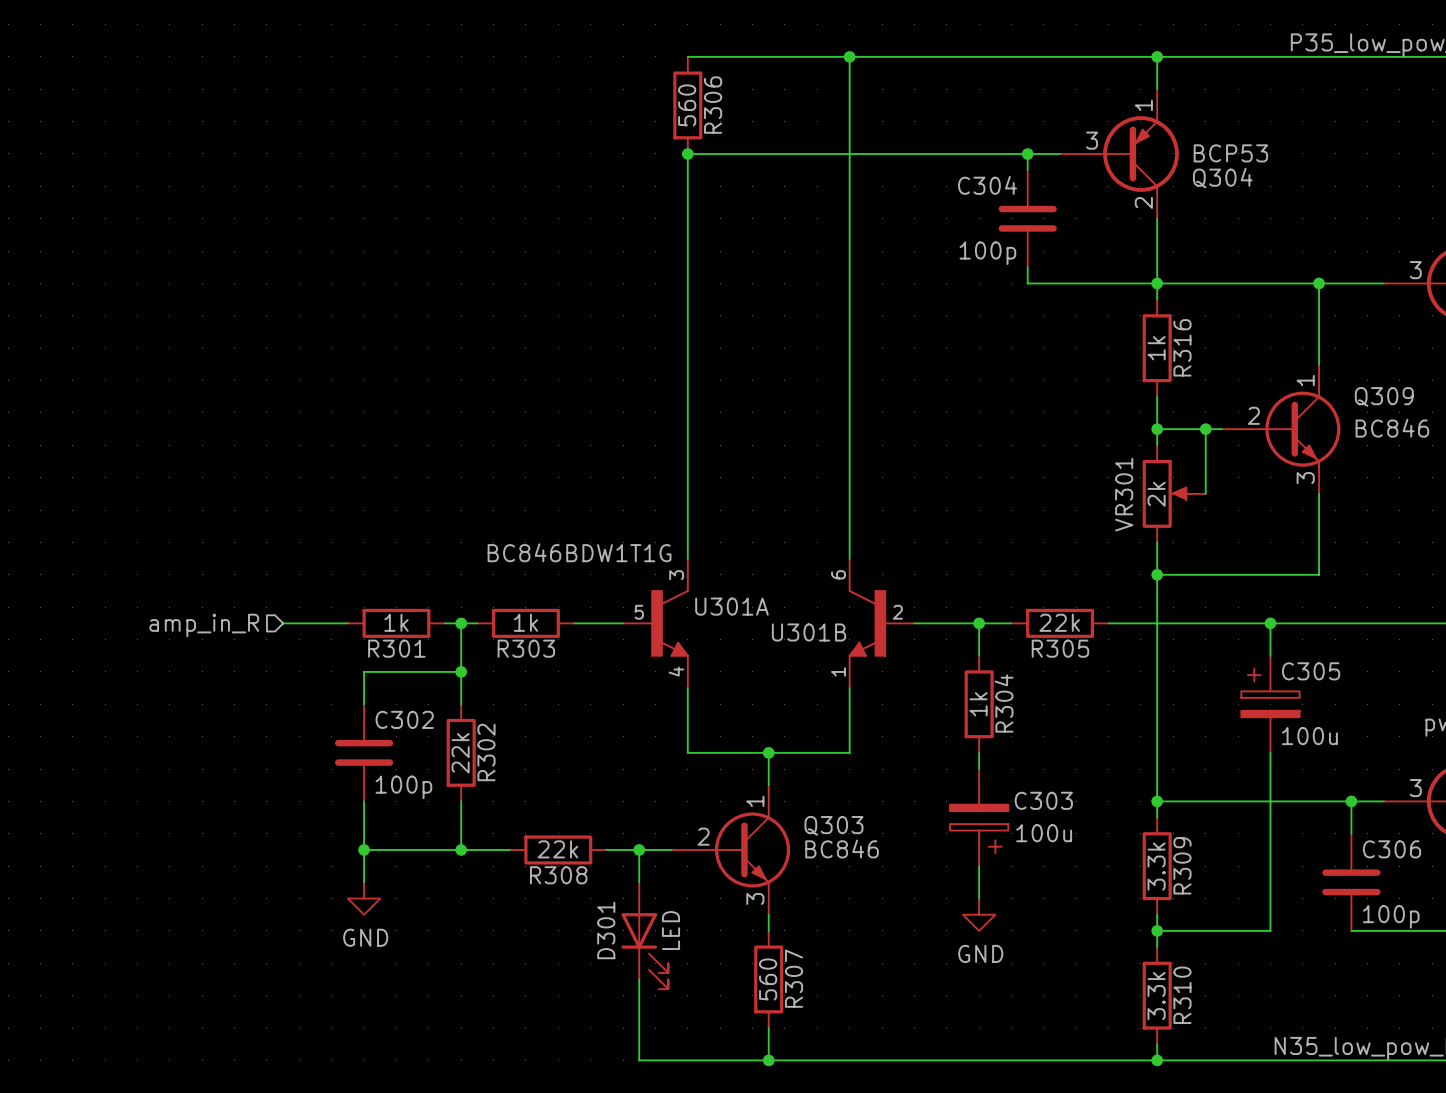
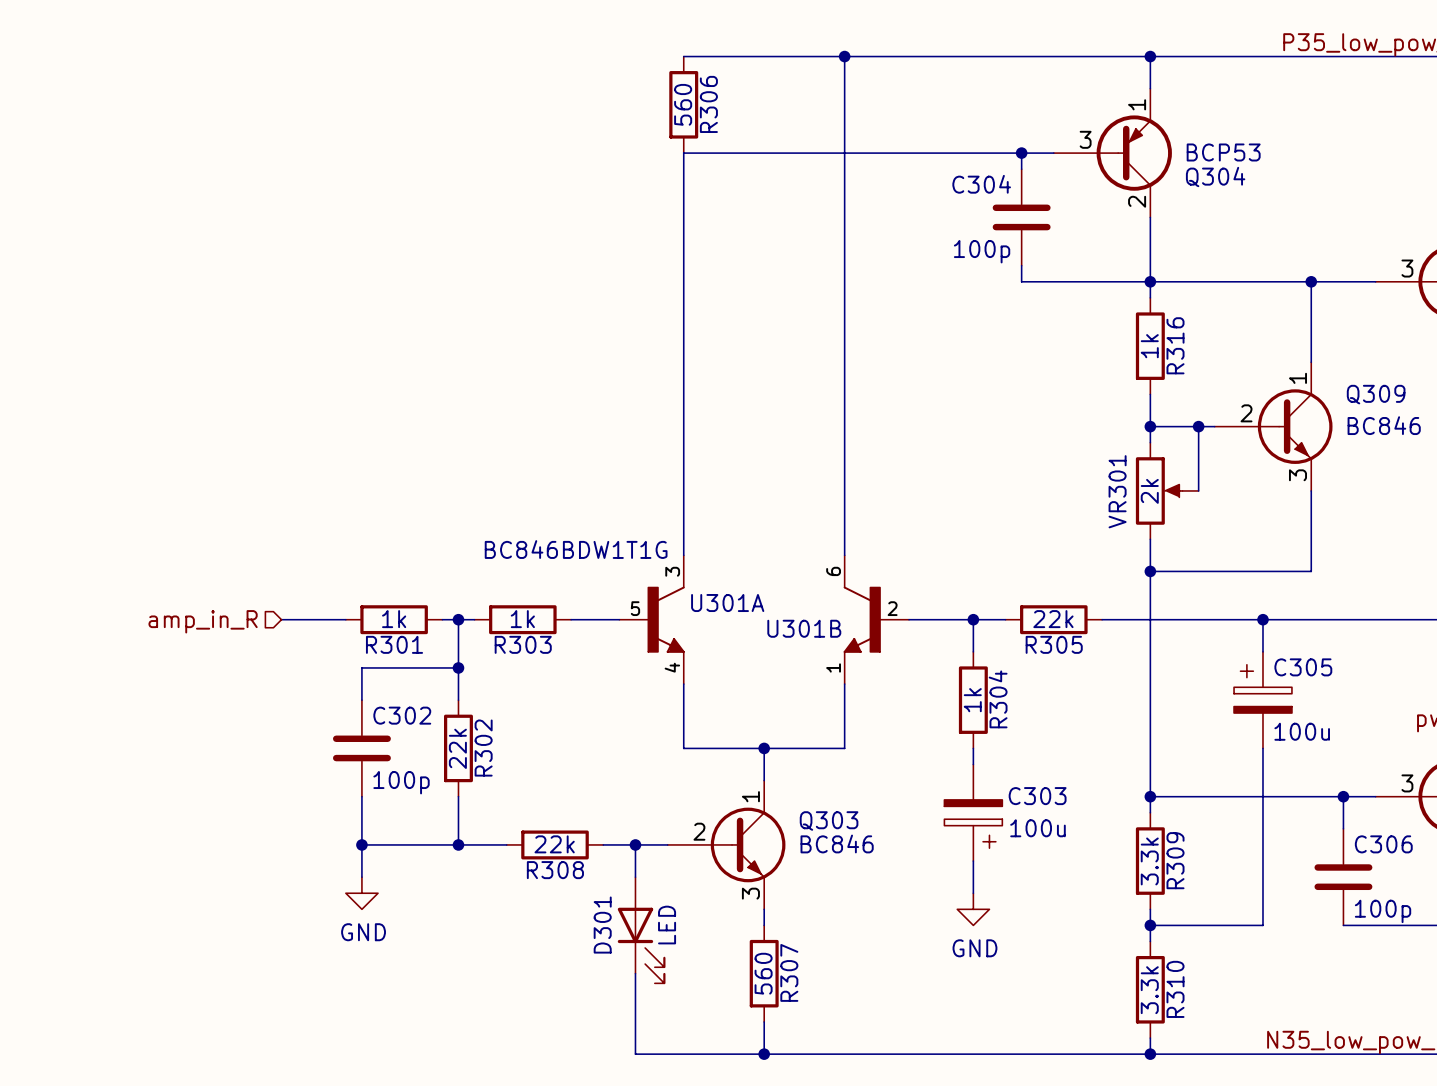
junction: (687, 153) -> none

